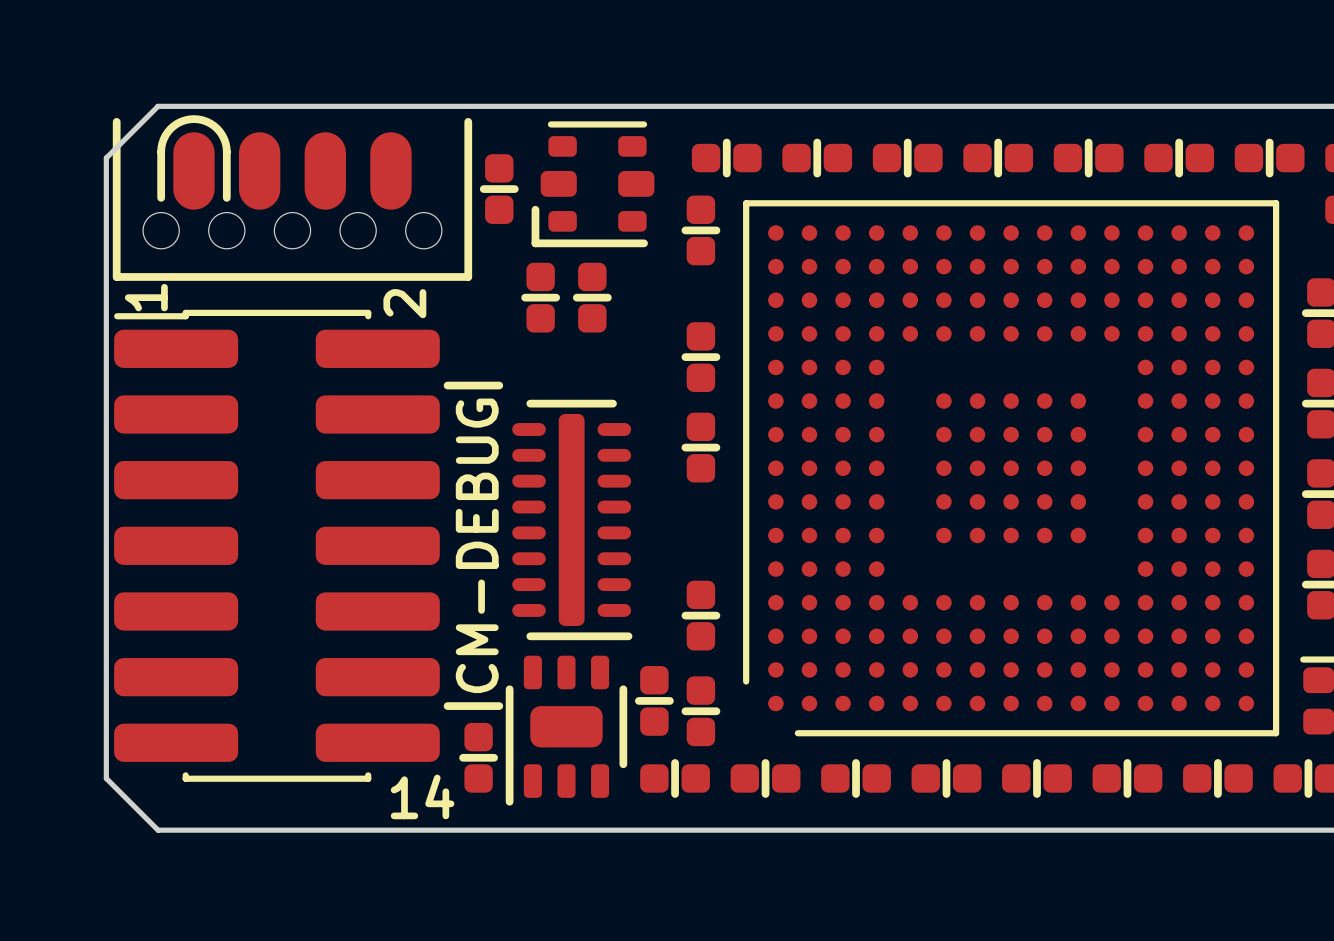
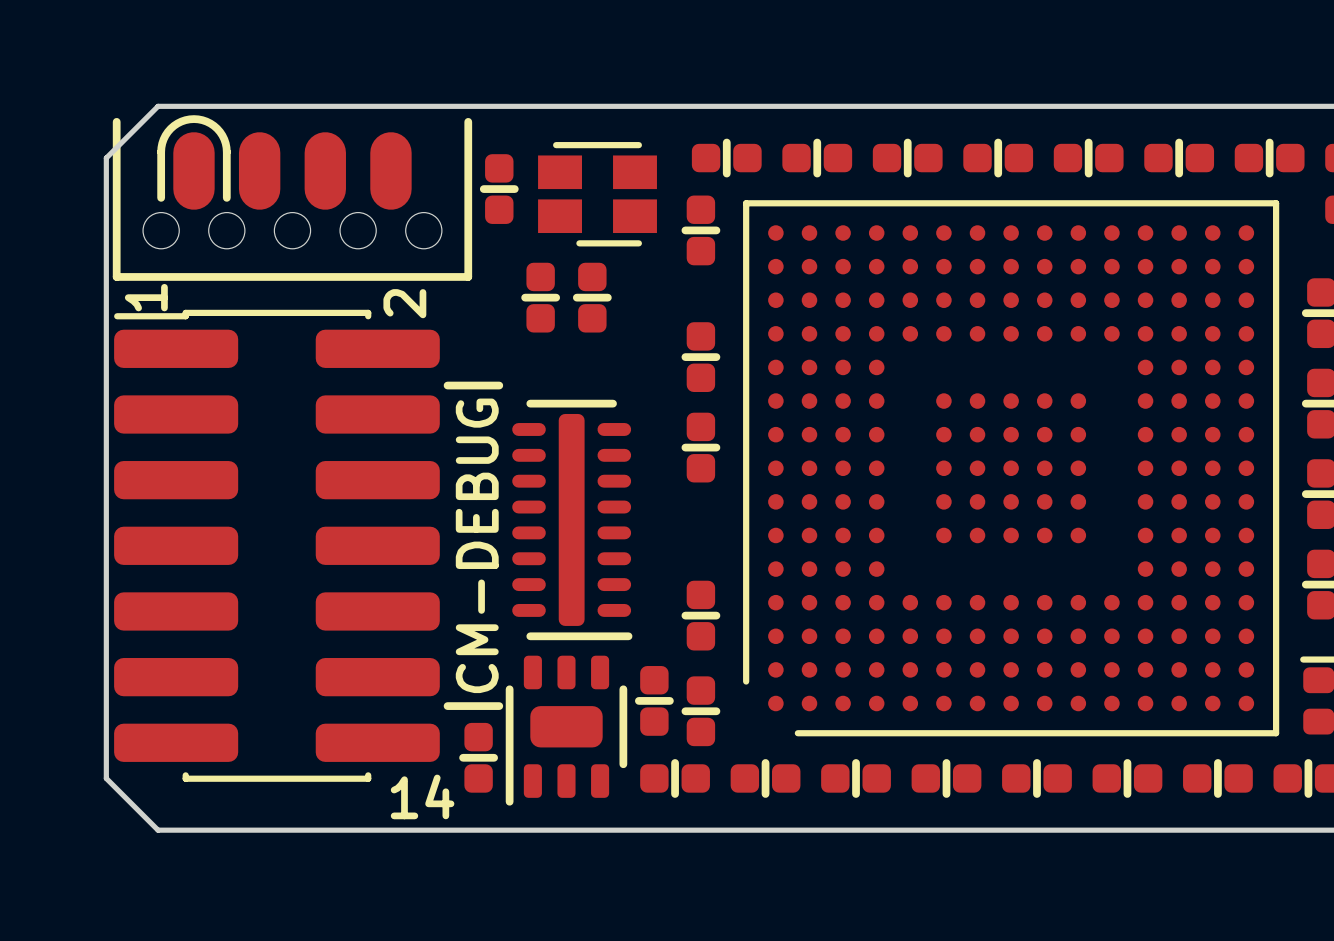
part footprint: [531, 121, 655, 248] -> [538, 142, 657, 247]

